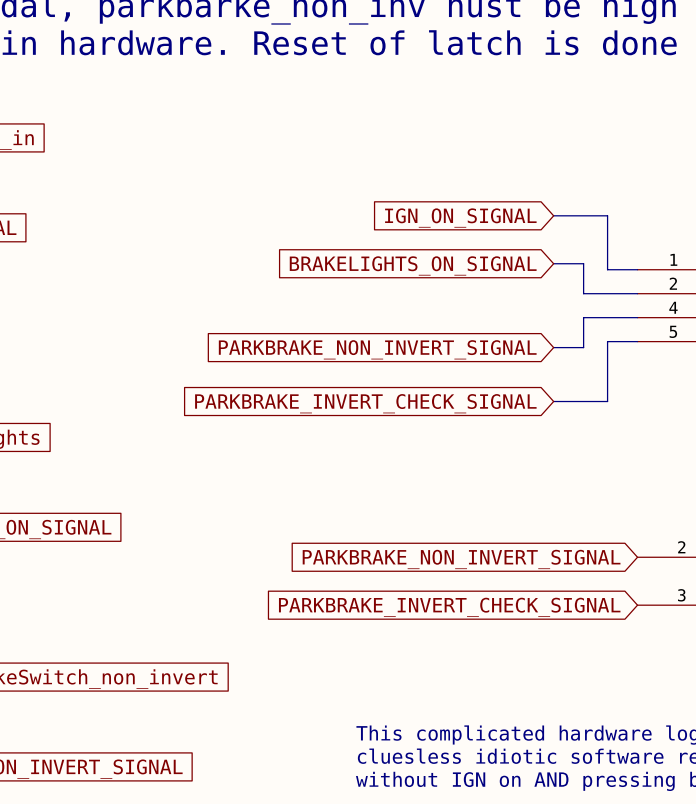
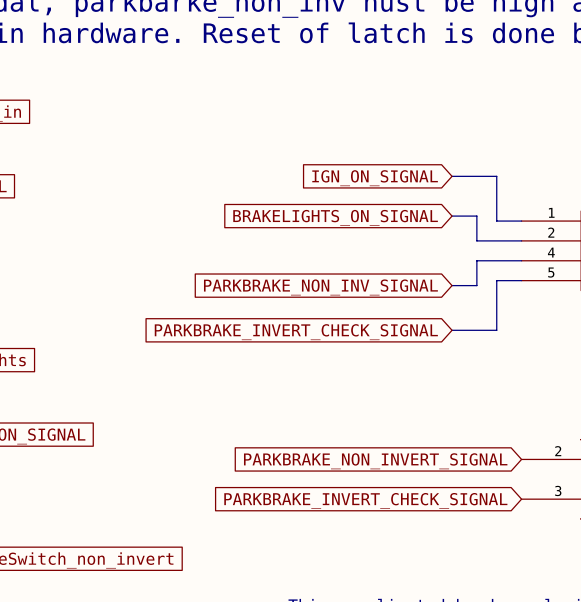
global label: PARKBRAKE_NON_INVERT_SIGNAL (377, 349) -> PARKBRAKE_NON_INV_SIGNAL (320, 287)

